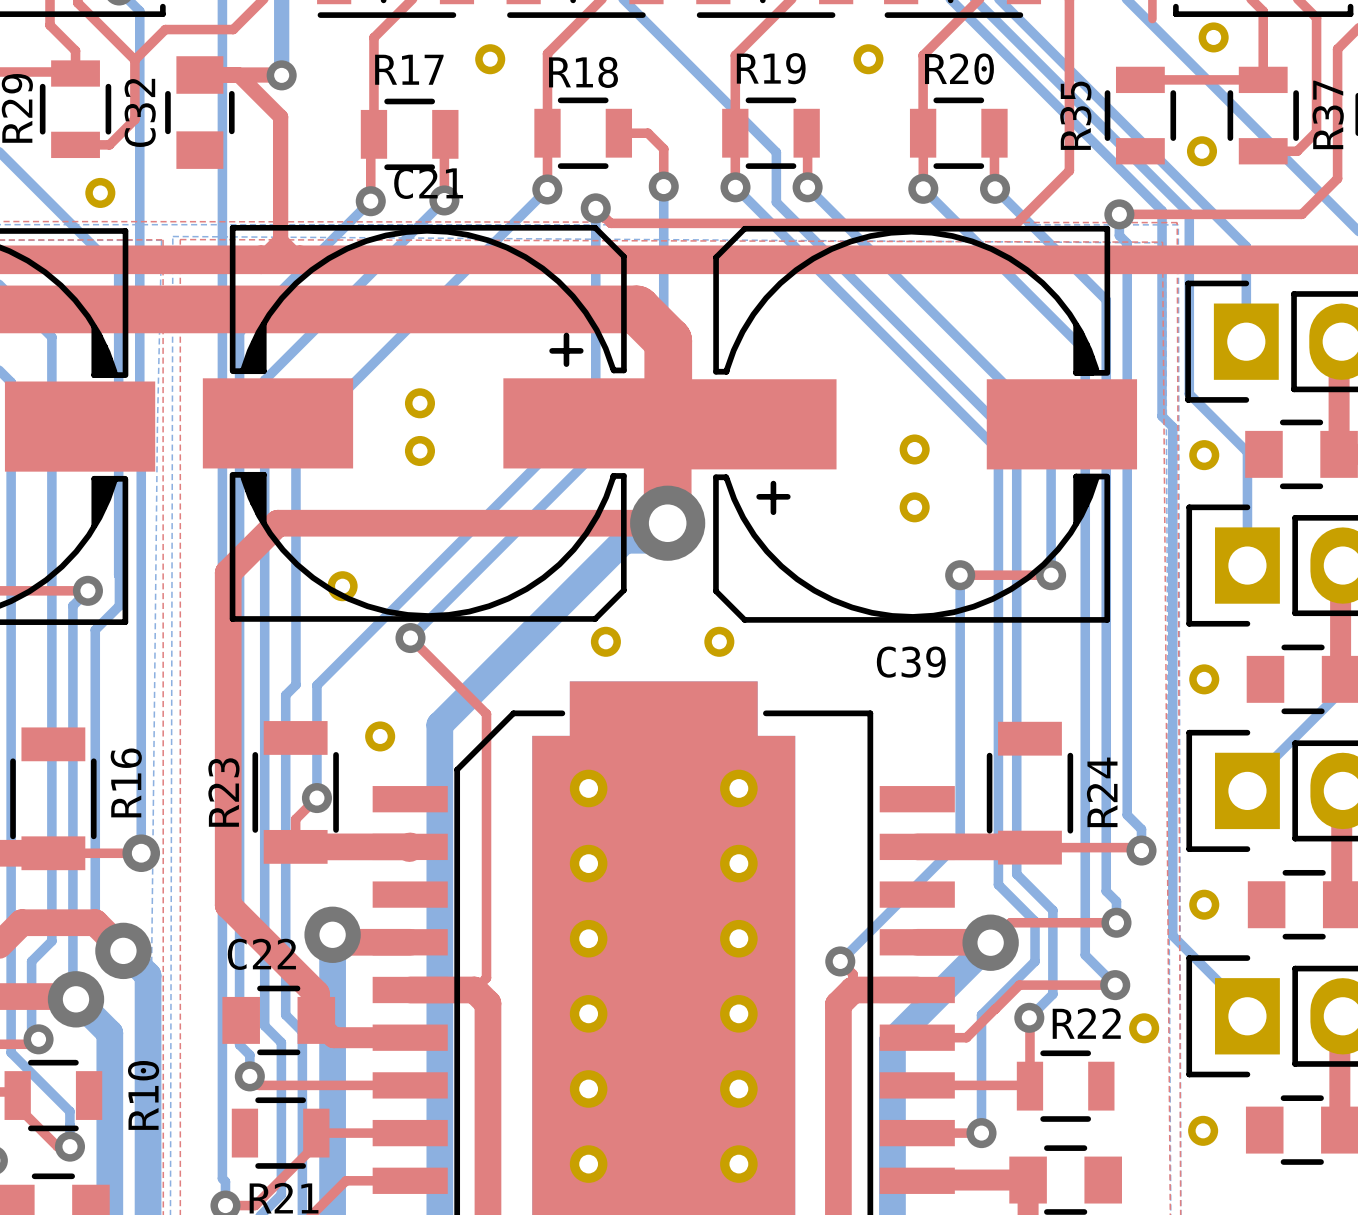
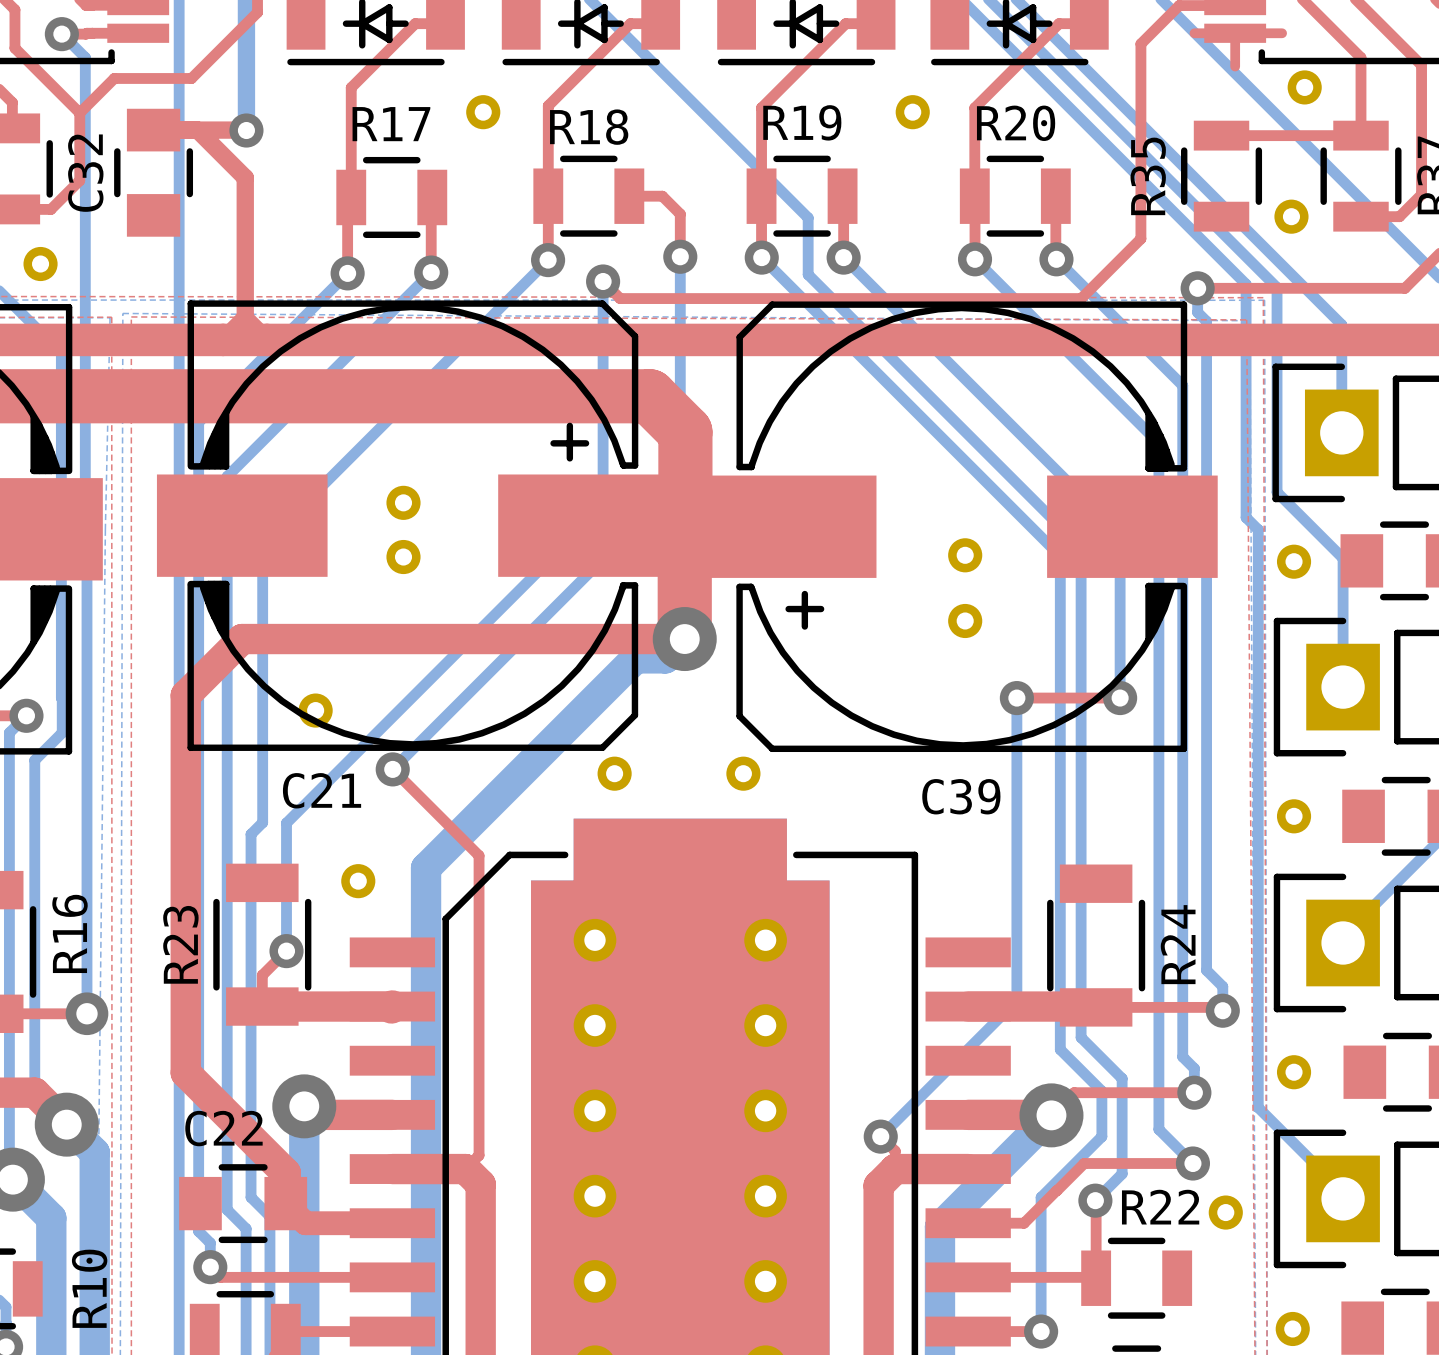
C21 name position: C21 (428, 183) -> C21 (322, 790)
via size: [630, 485, 706, 561] -> [652, 607, 717, 672]

